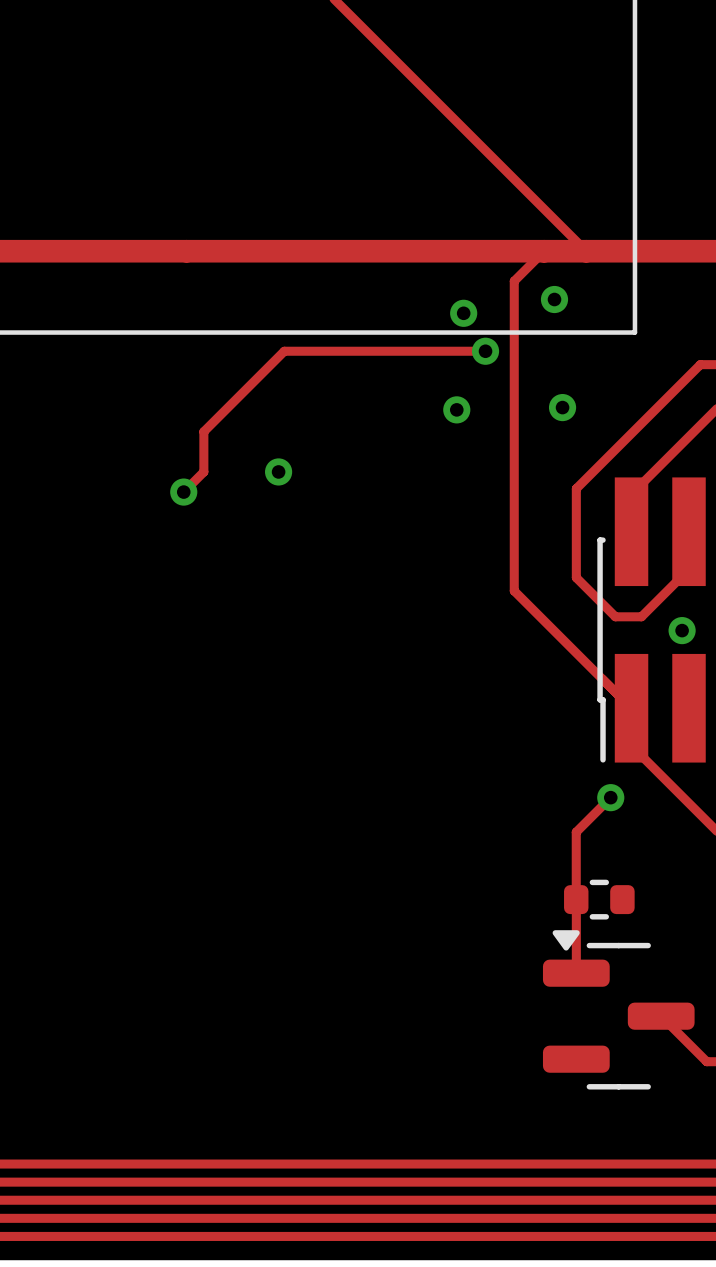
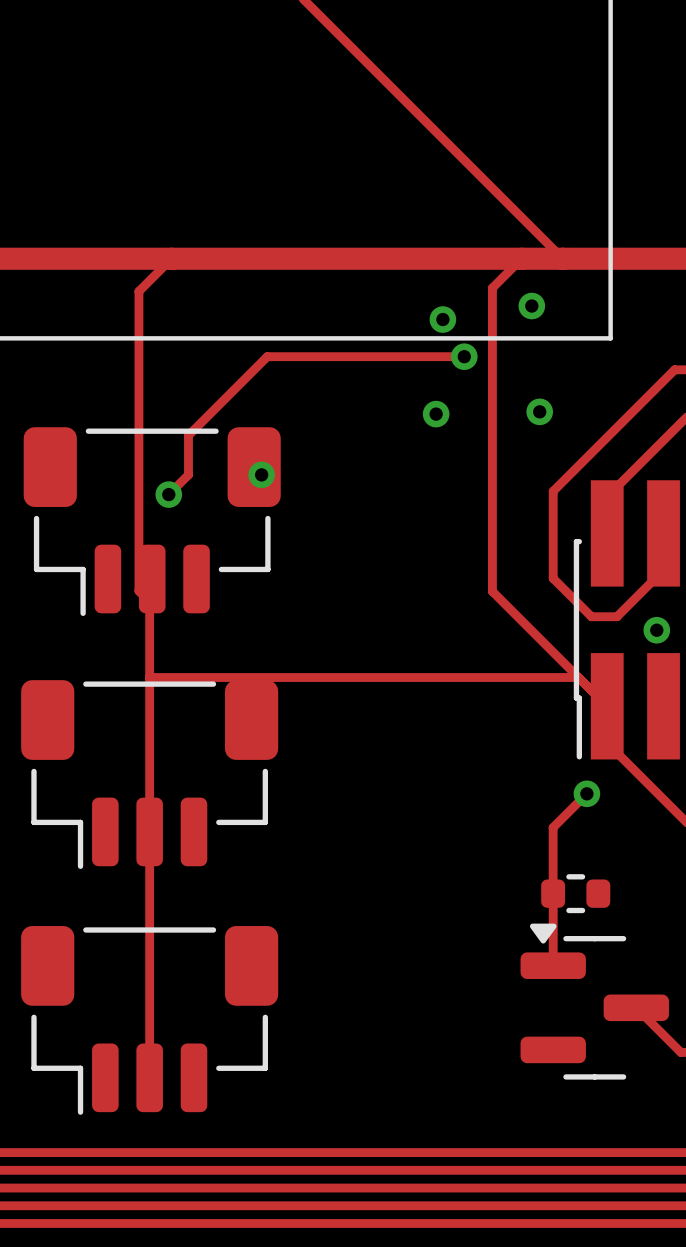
track: none -> (171, 258) (138, 291) (138, 591) (152, 604) (149, 606) (149, 1103)
part: none -> (152, 521)
track: none -> (149, 677) (578, 677)
part: none -> (149, 774)
part: none -> (149, 1020)

